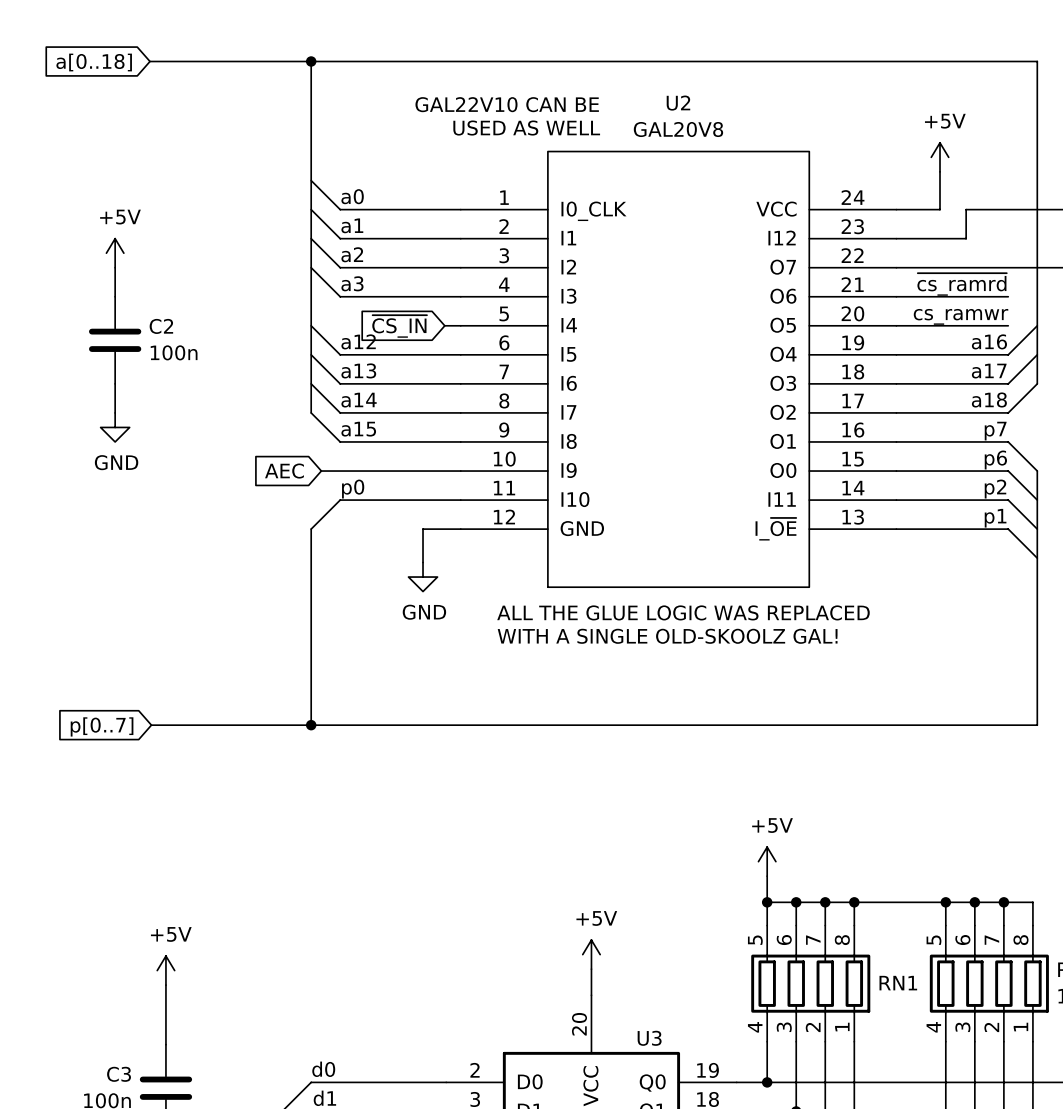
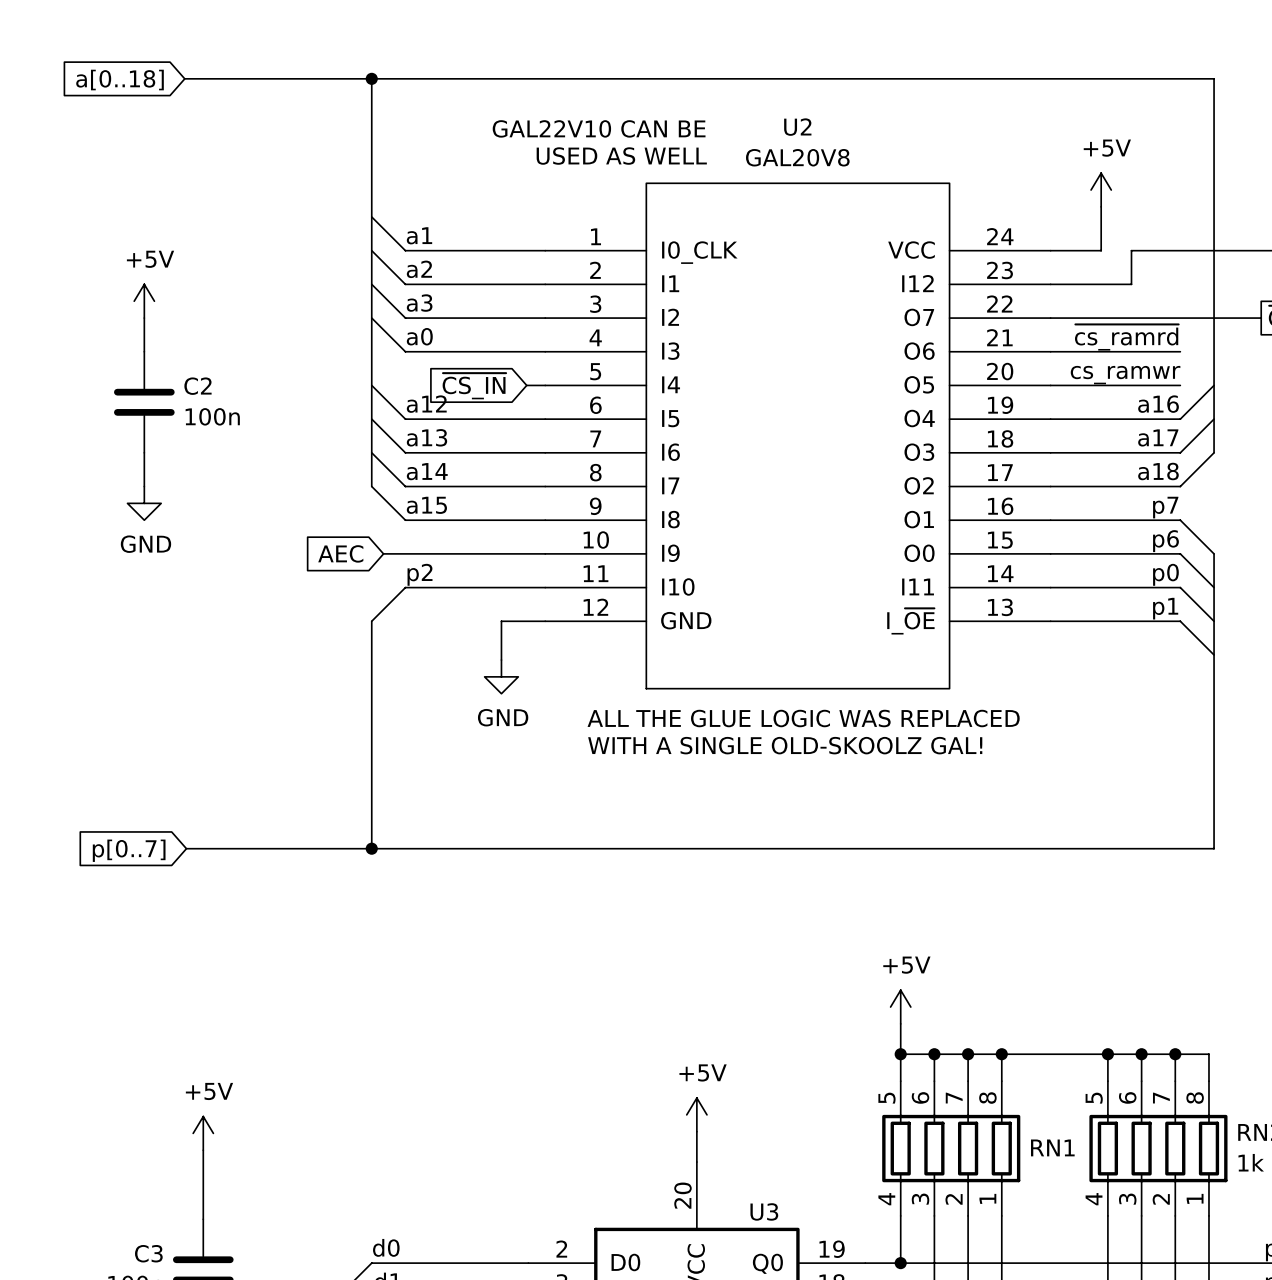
label: a0 (352, 196) -> a1 (419, 235)
label: a1 (352, 225) -> a2 (419, 269)
label: a2 (352, 254) -> a3 (419, 303)
label: a3 (352, 283) -> a0 (419, 336)
label: p0 (353, 489) -> p2 (420, 574)
label: p2 (995, 489) -> p0 (1165, 574)

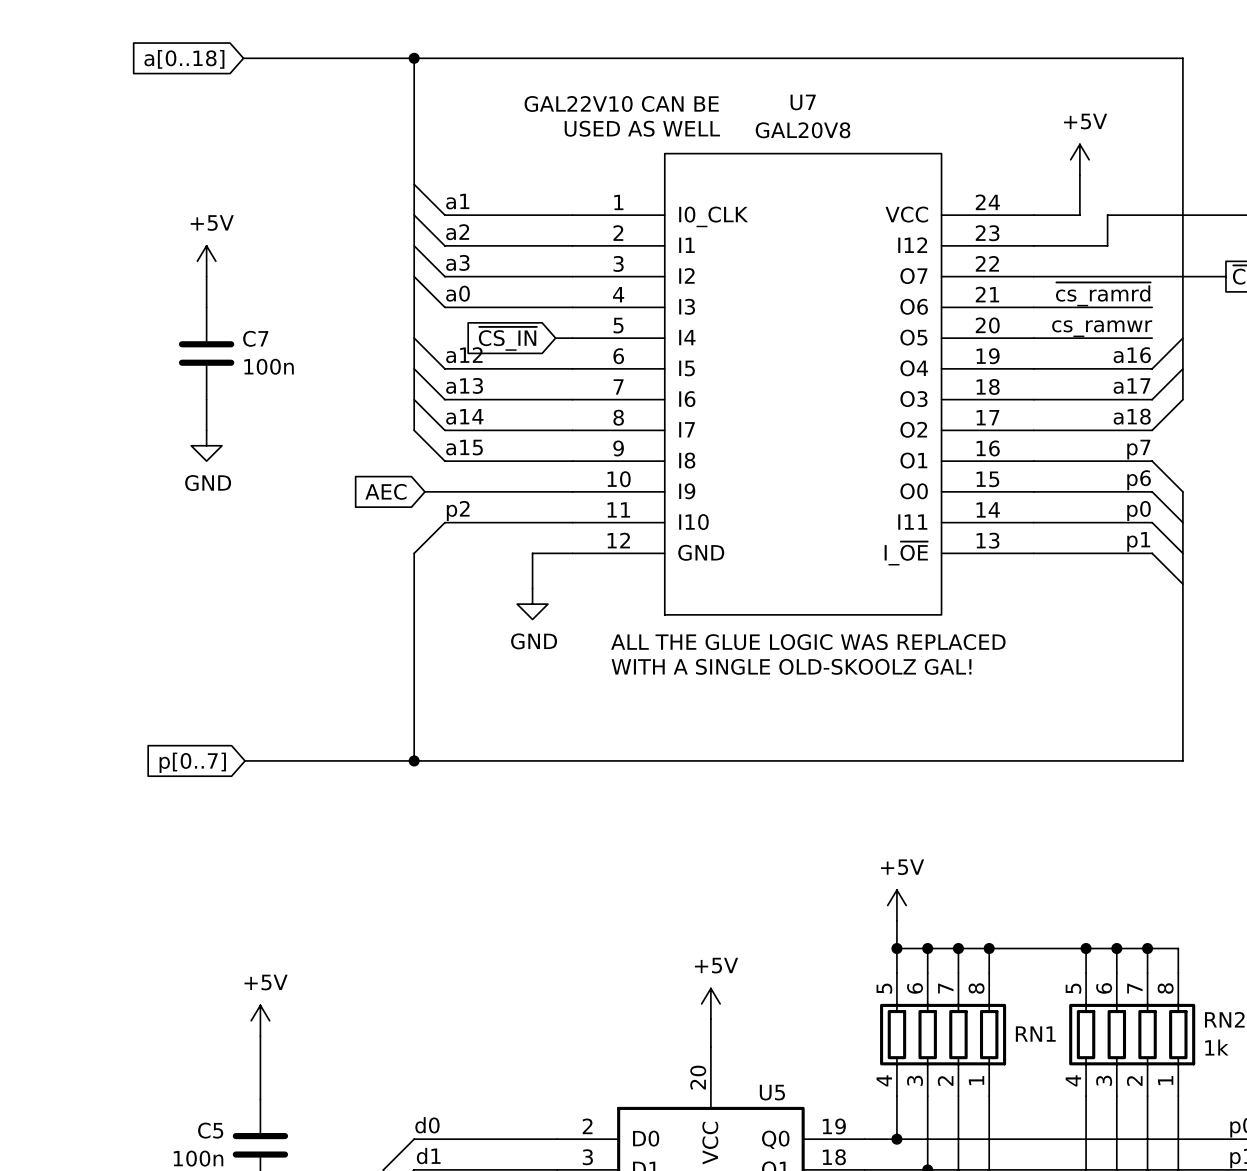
U2 name: U2 (797, 127) -> U7 (803, 102)
C2 name: C2 (197, 386) -> C7 (255, 338)
U3 name: U3 (764, 1211) -> U5 (772, 1092)
C3 name: C3 (148, 1253) -> C5 (210, 1130)

